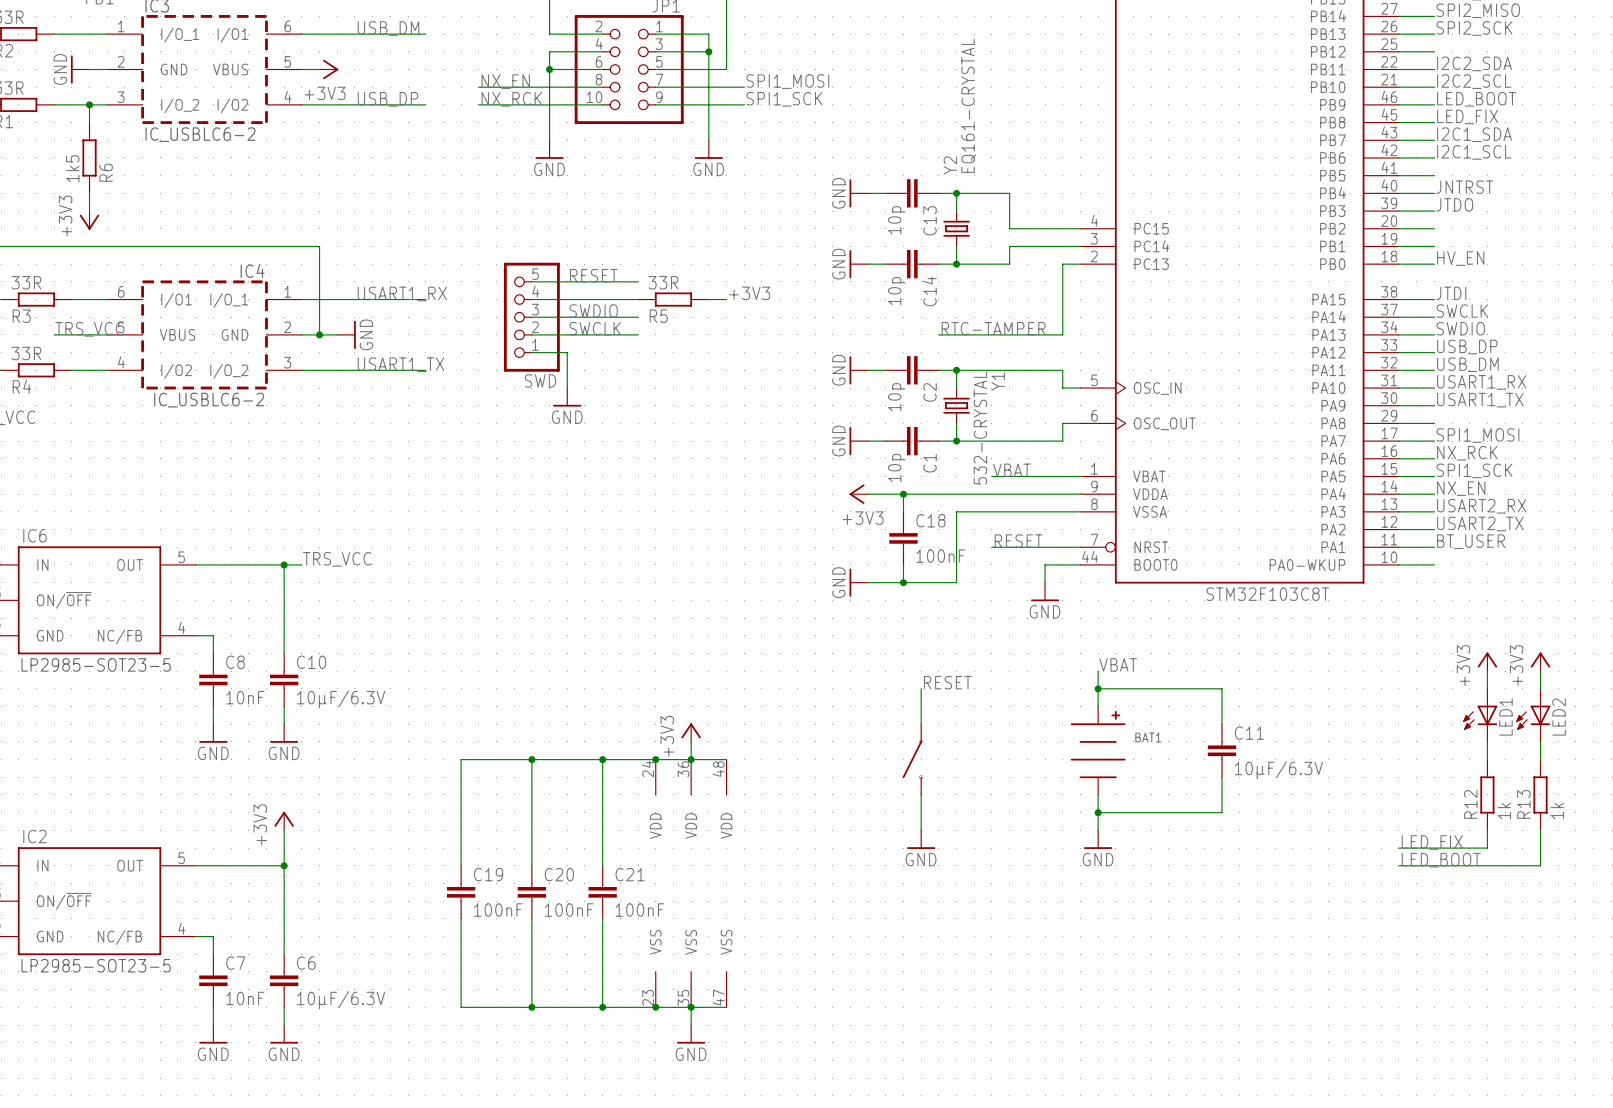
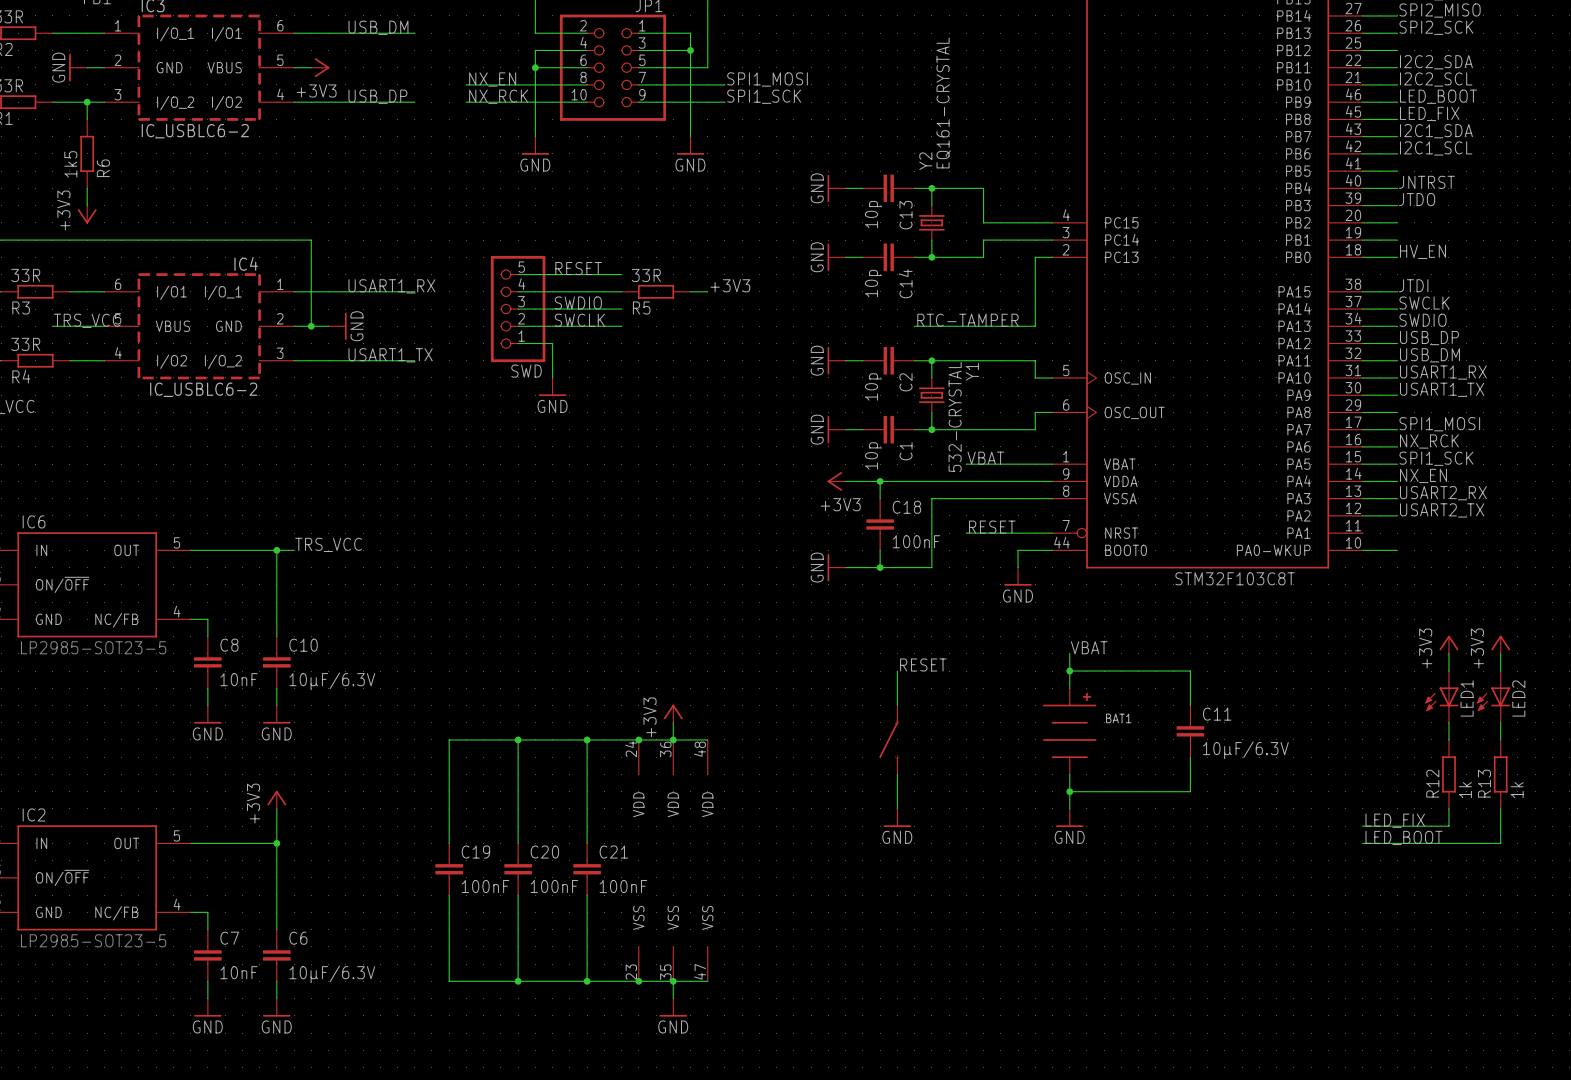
label: BT_USER (1471, 541) -> none
wire: (1398, 547) (1434, 547) -> none

